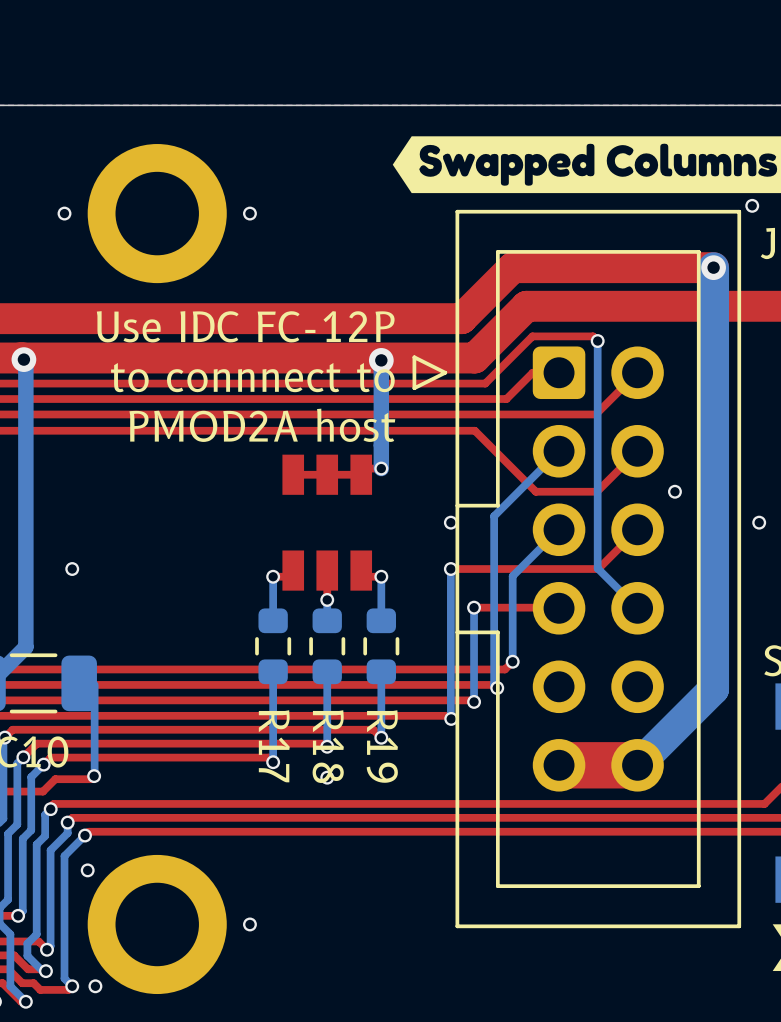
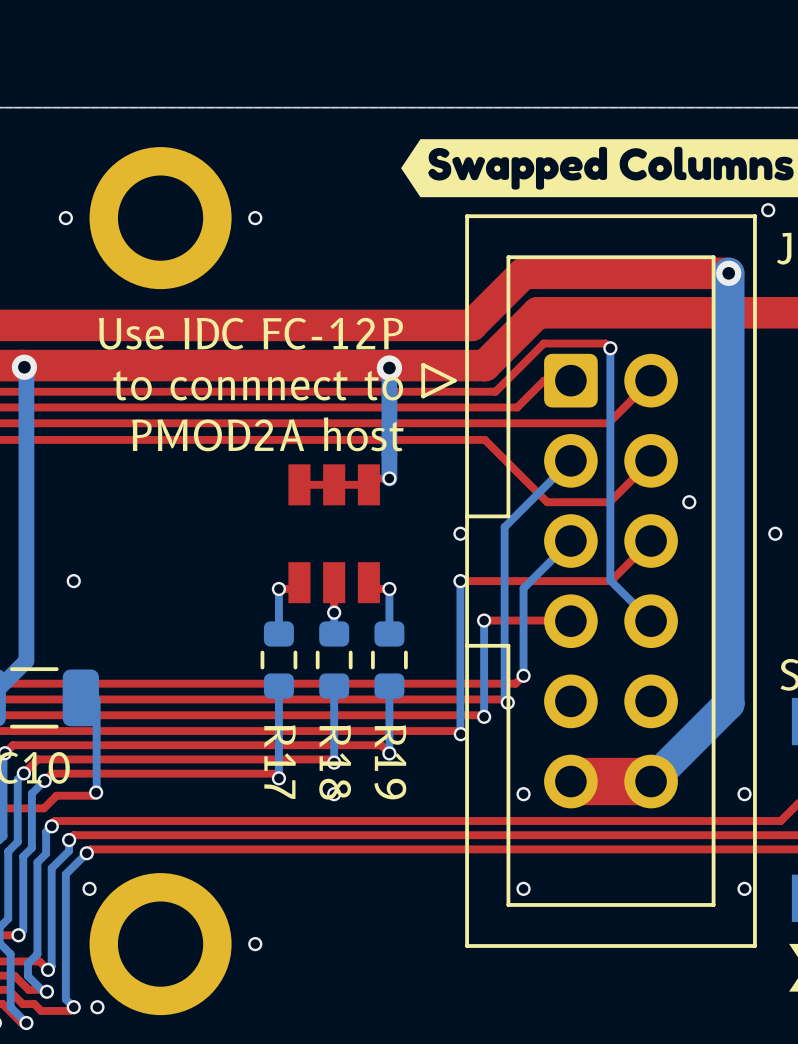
via: none -> (523, 794)
via: none -> (744, 794)
via: none -> (523, 888)
via: none -> (744, 888)

